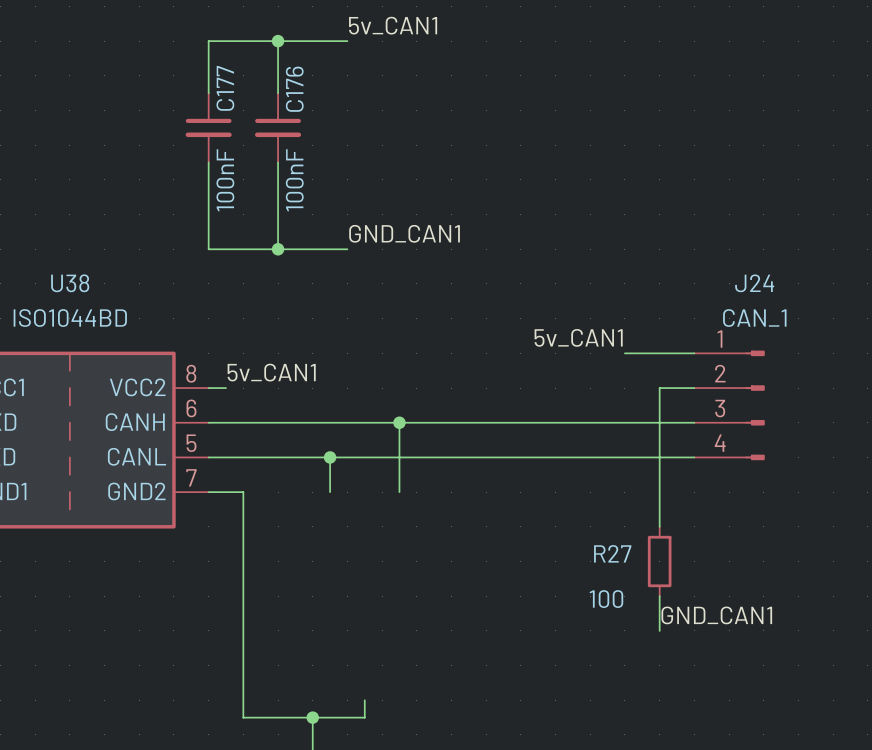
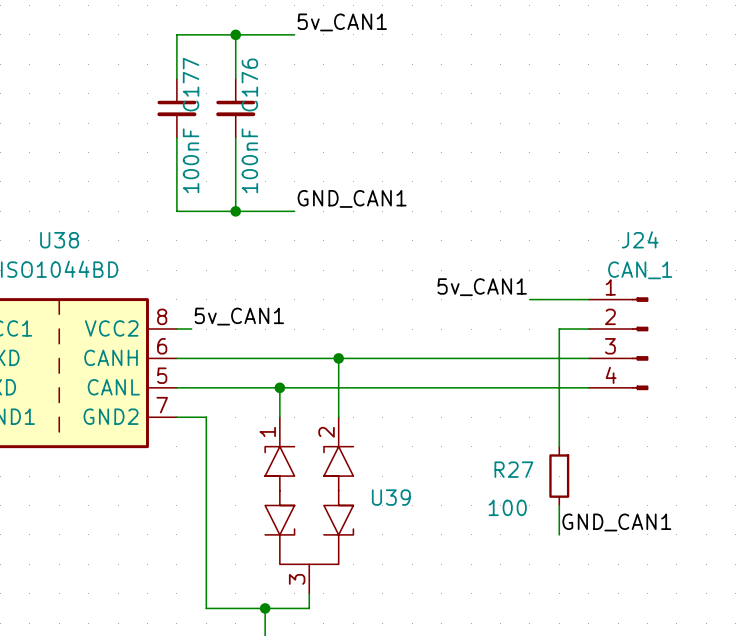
U39: none -> (309, 505)

